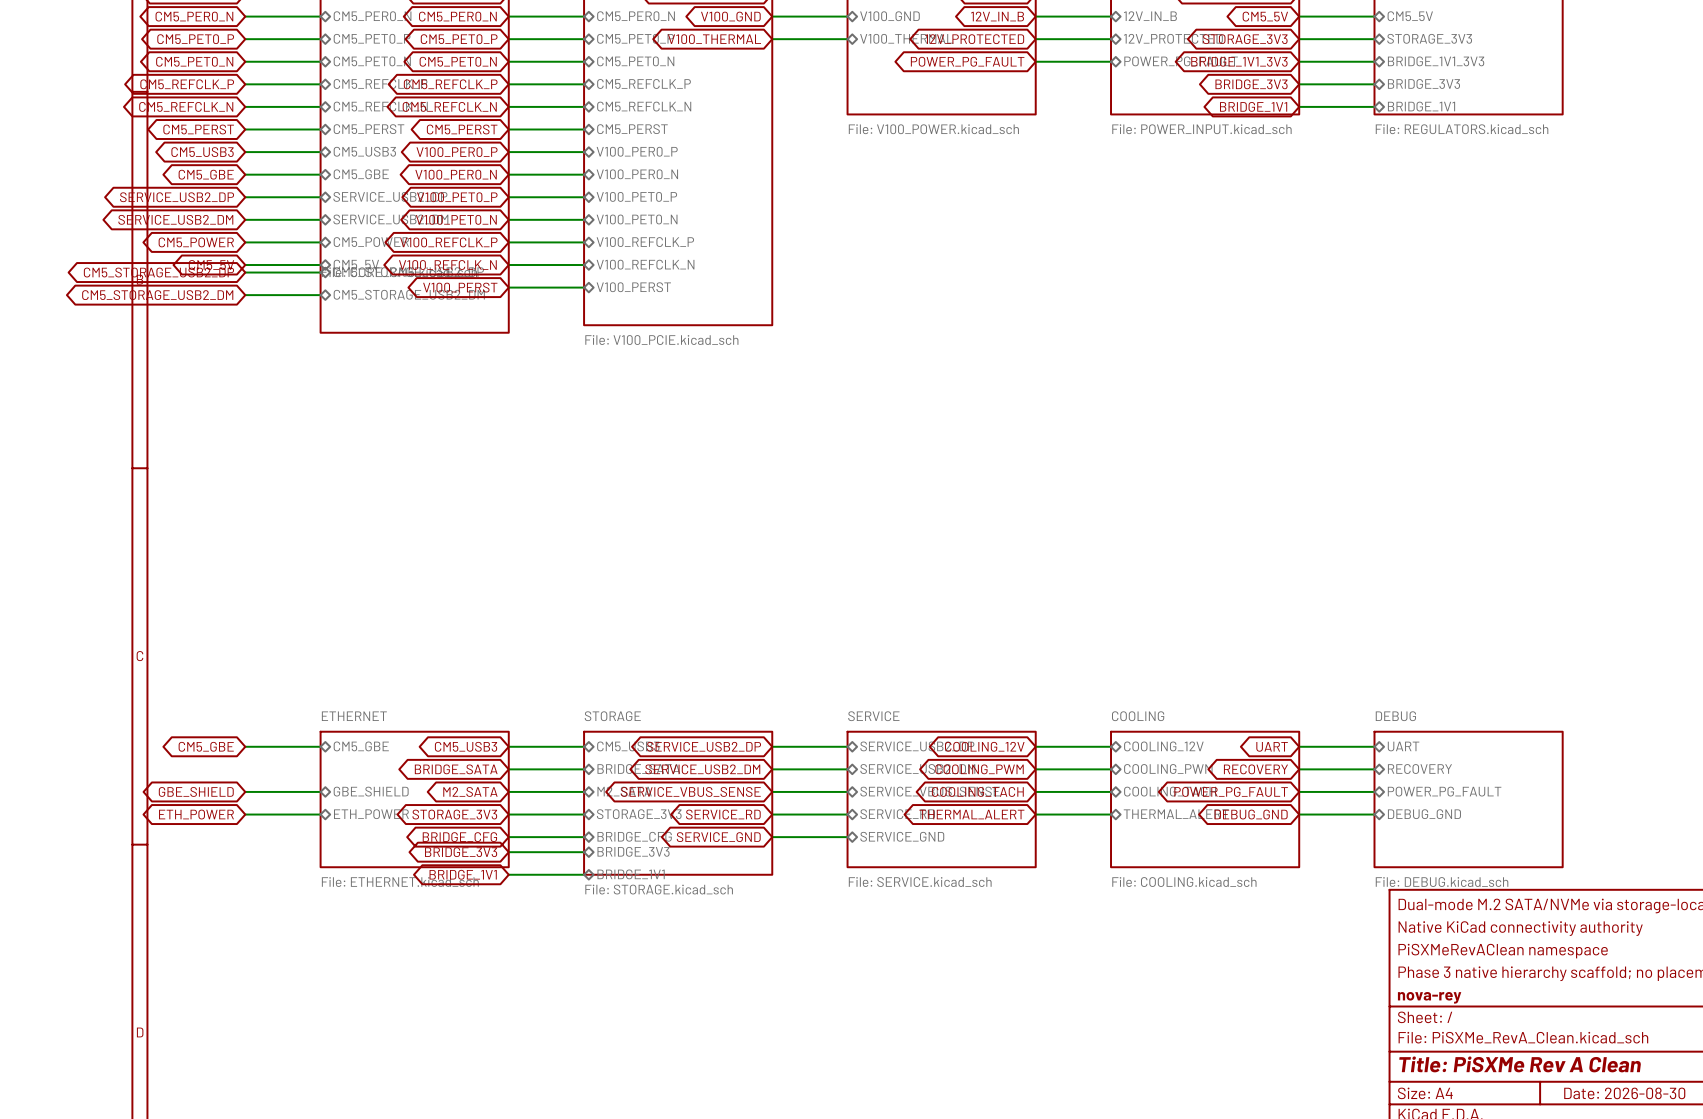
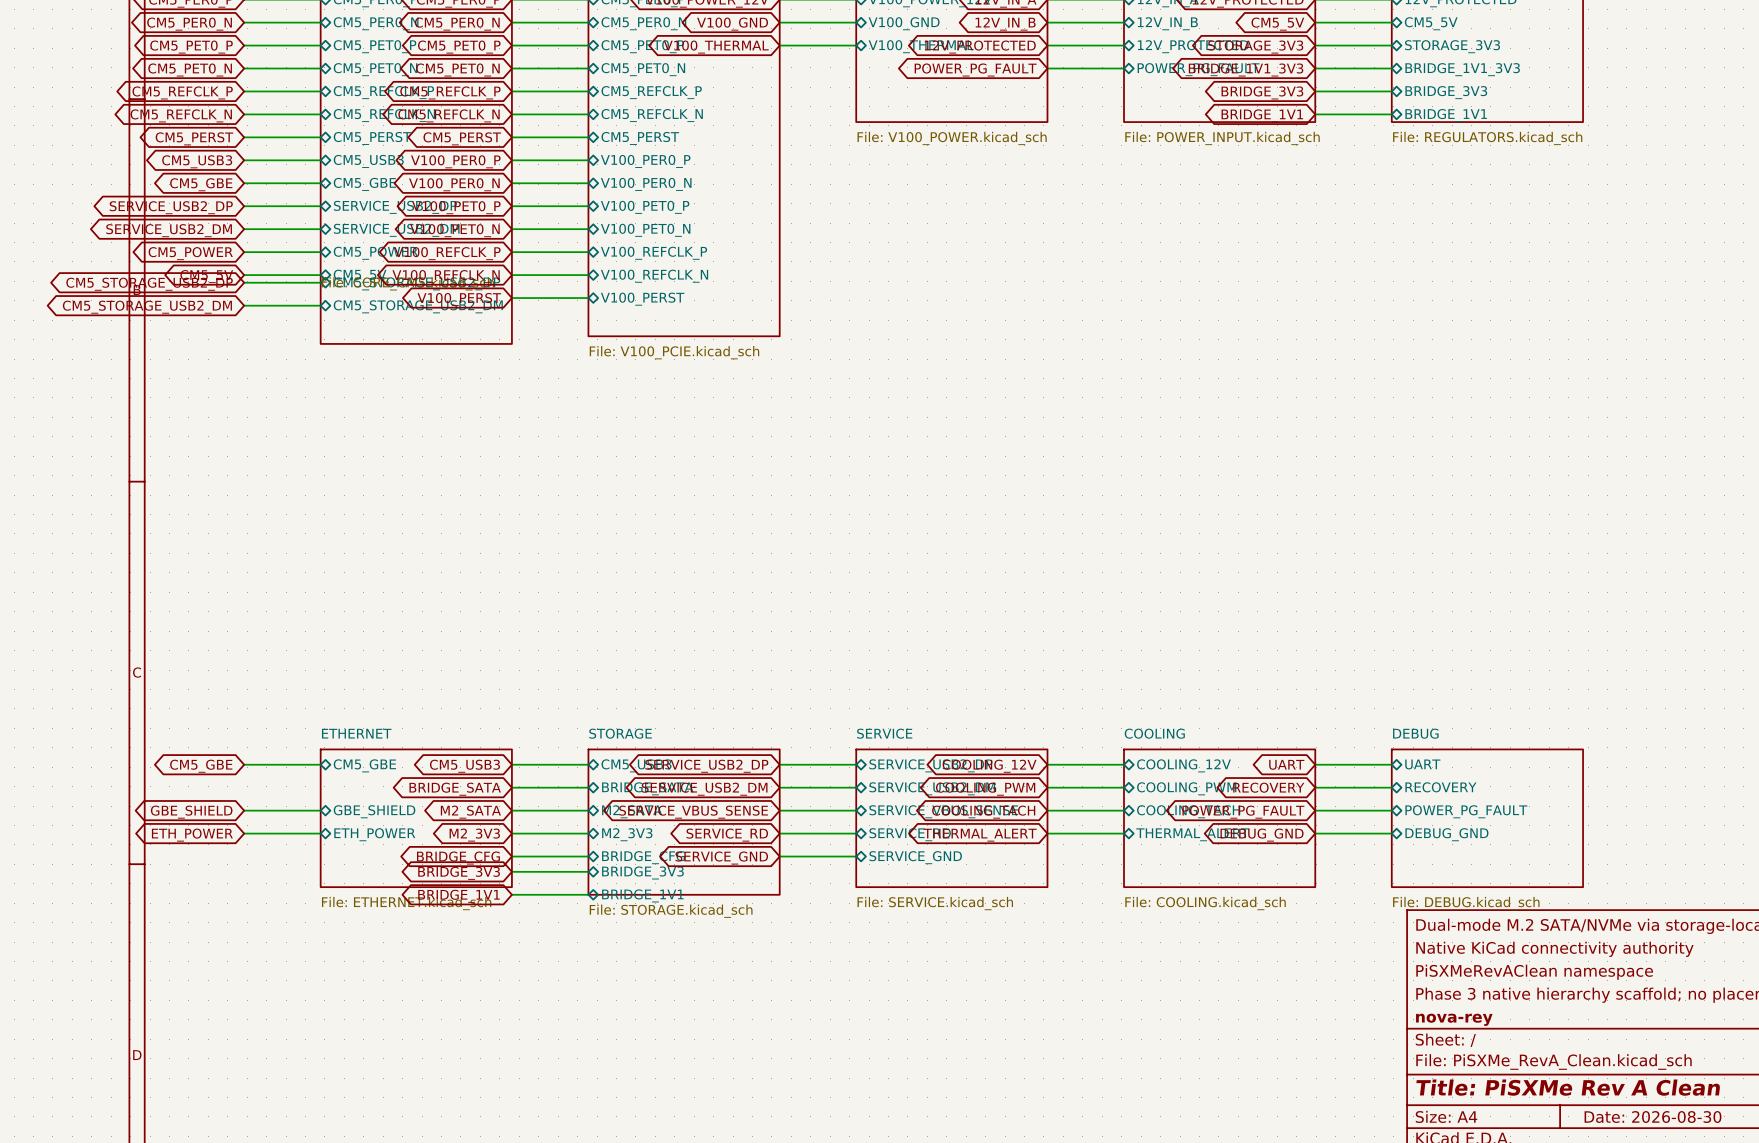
global label: STORAGE_3V3 (454, 814) -> M2_3V3 (474, 835)
sheet pin: STORAGE_3V3 (639, 814) -> M2_3V3 (627, 834)

